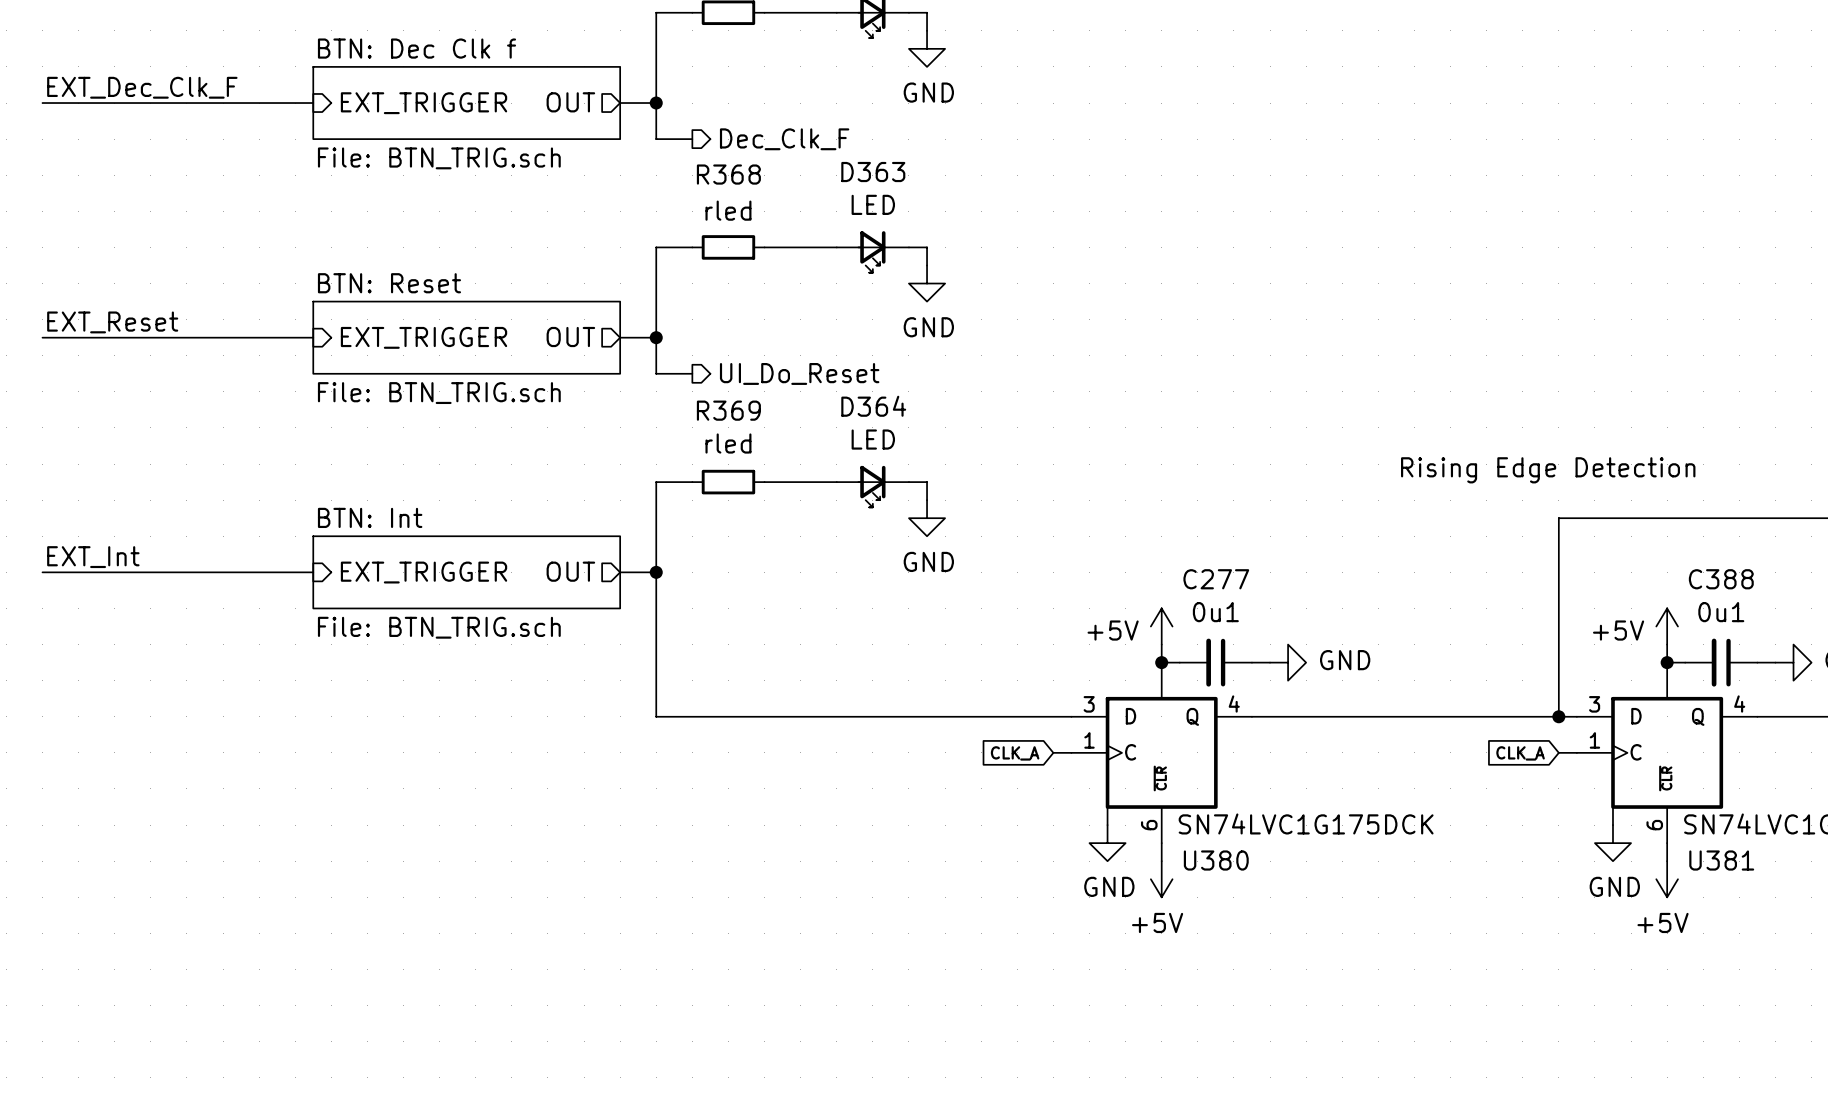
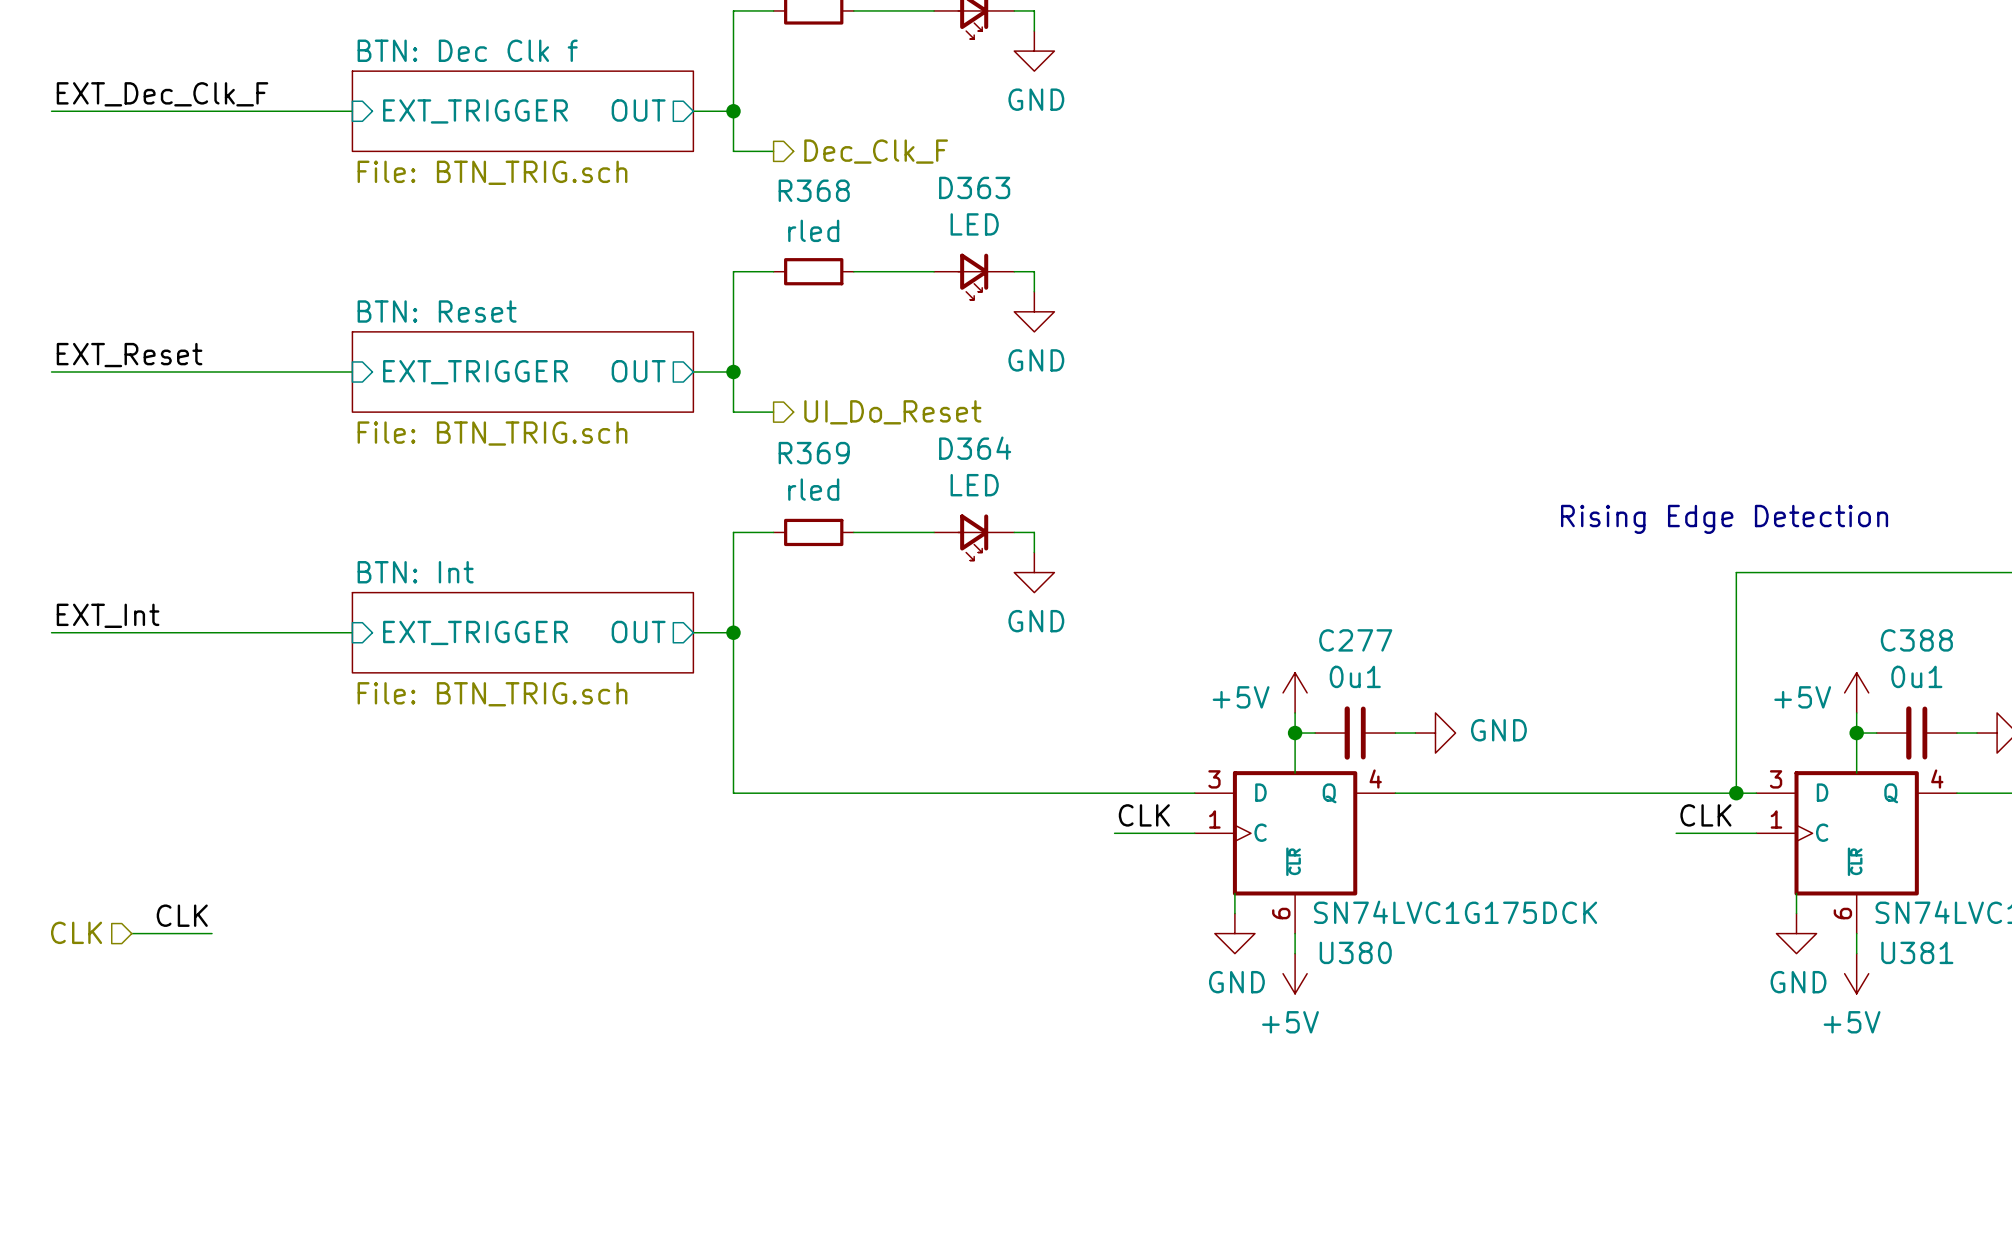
label: none -> CLK (1144, 815)
label: none -> CLK (1705, 815)
wire: none -> (1114, 833) (1174, 833)
wire: none -> (1676, 833) (1736, 833)
global label: CLK_A (1015, 753) -> none
global label: CLK_A (1520, 753) -> none
label: none -> CLK (182, 915)
hierarchical label: none -> CLK (76, 932)
wire: none -> (131, 933) (212, 933)

